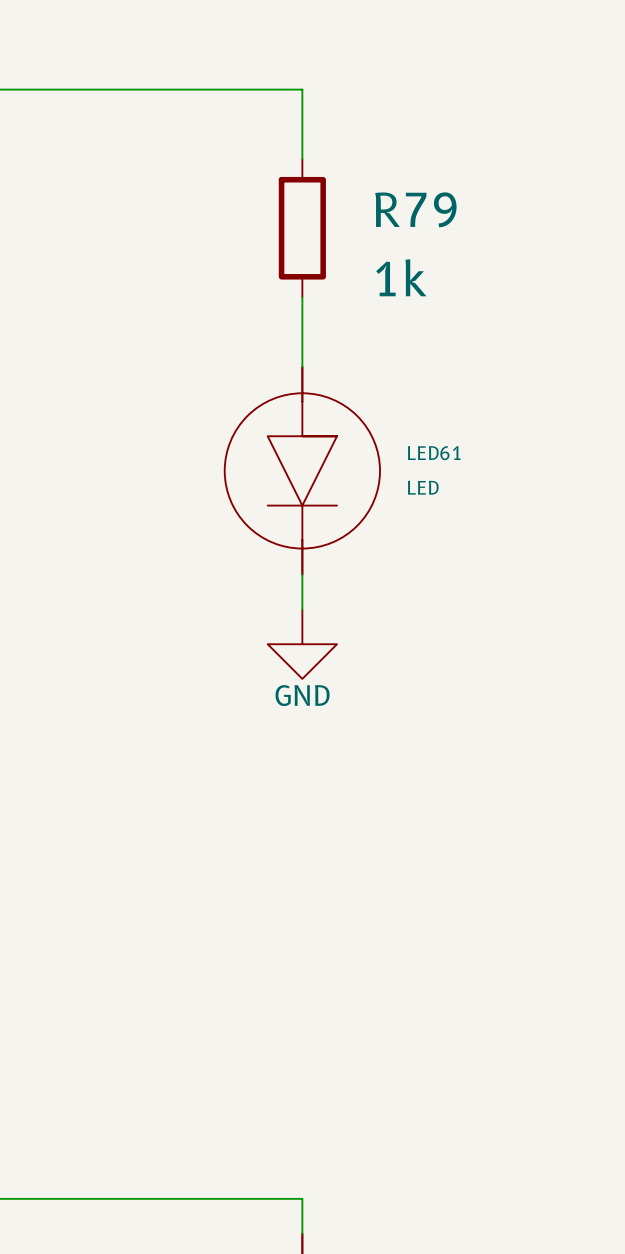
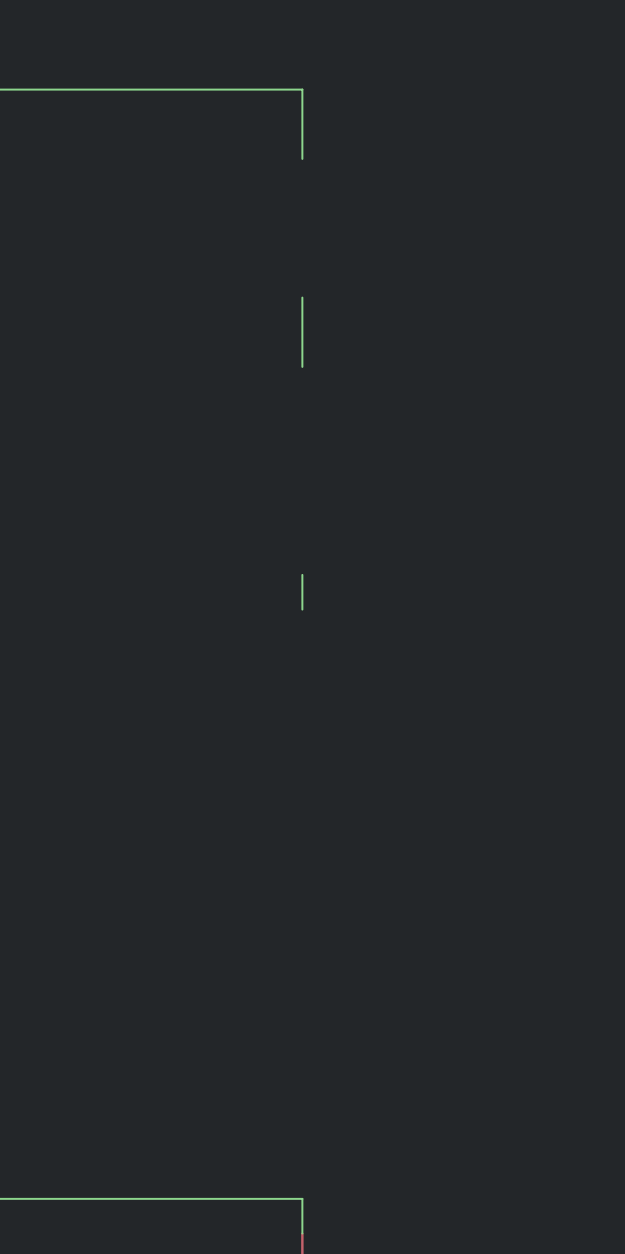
R79: 1k (302, 228) -> none
LED61: LED (302, 470) -> none
power symbol: GND (302, 644) -> none

